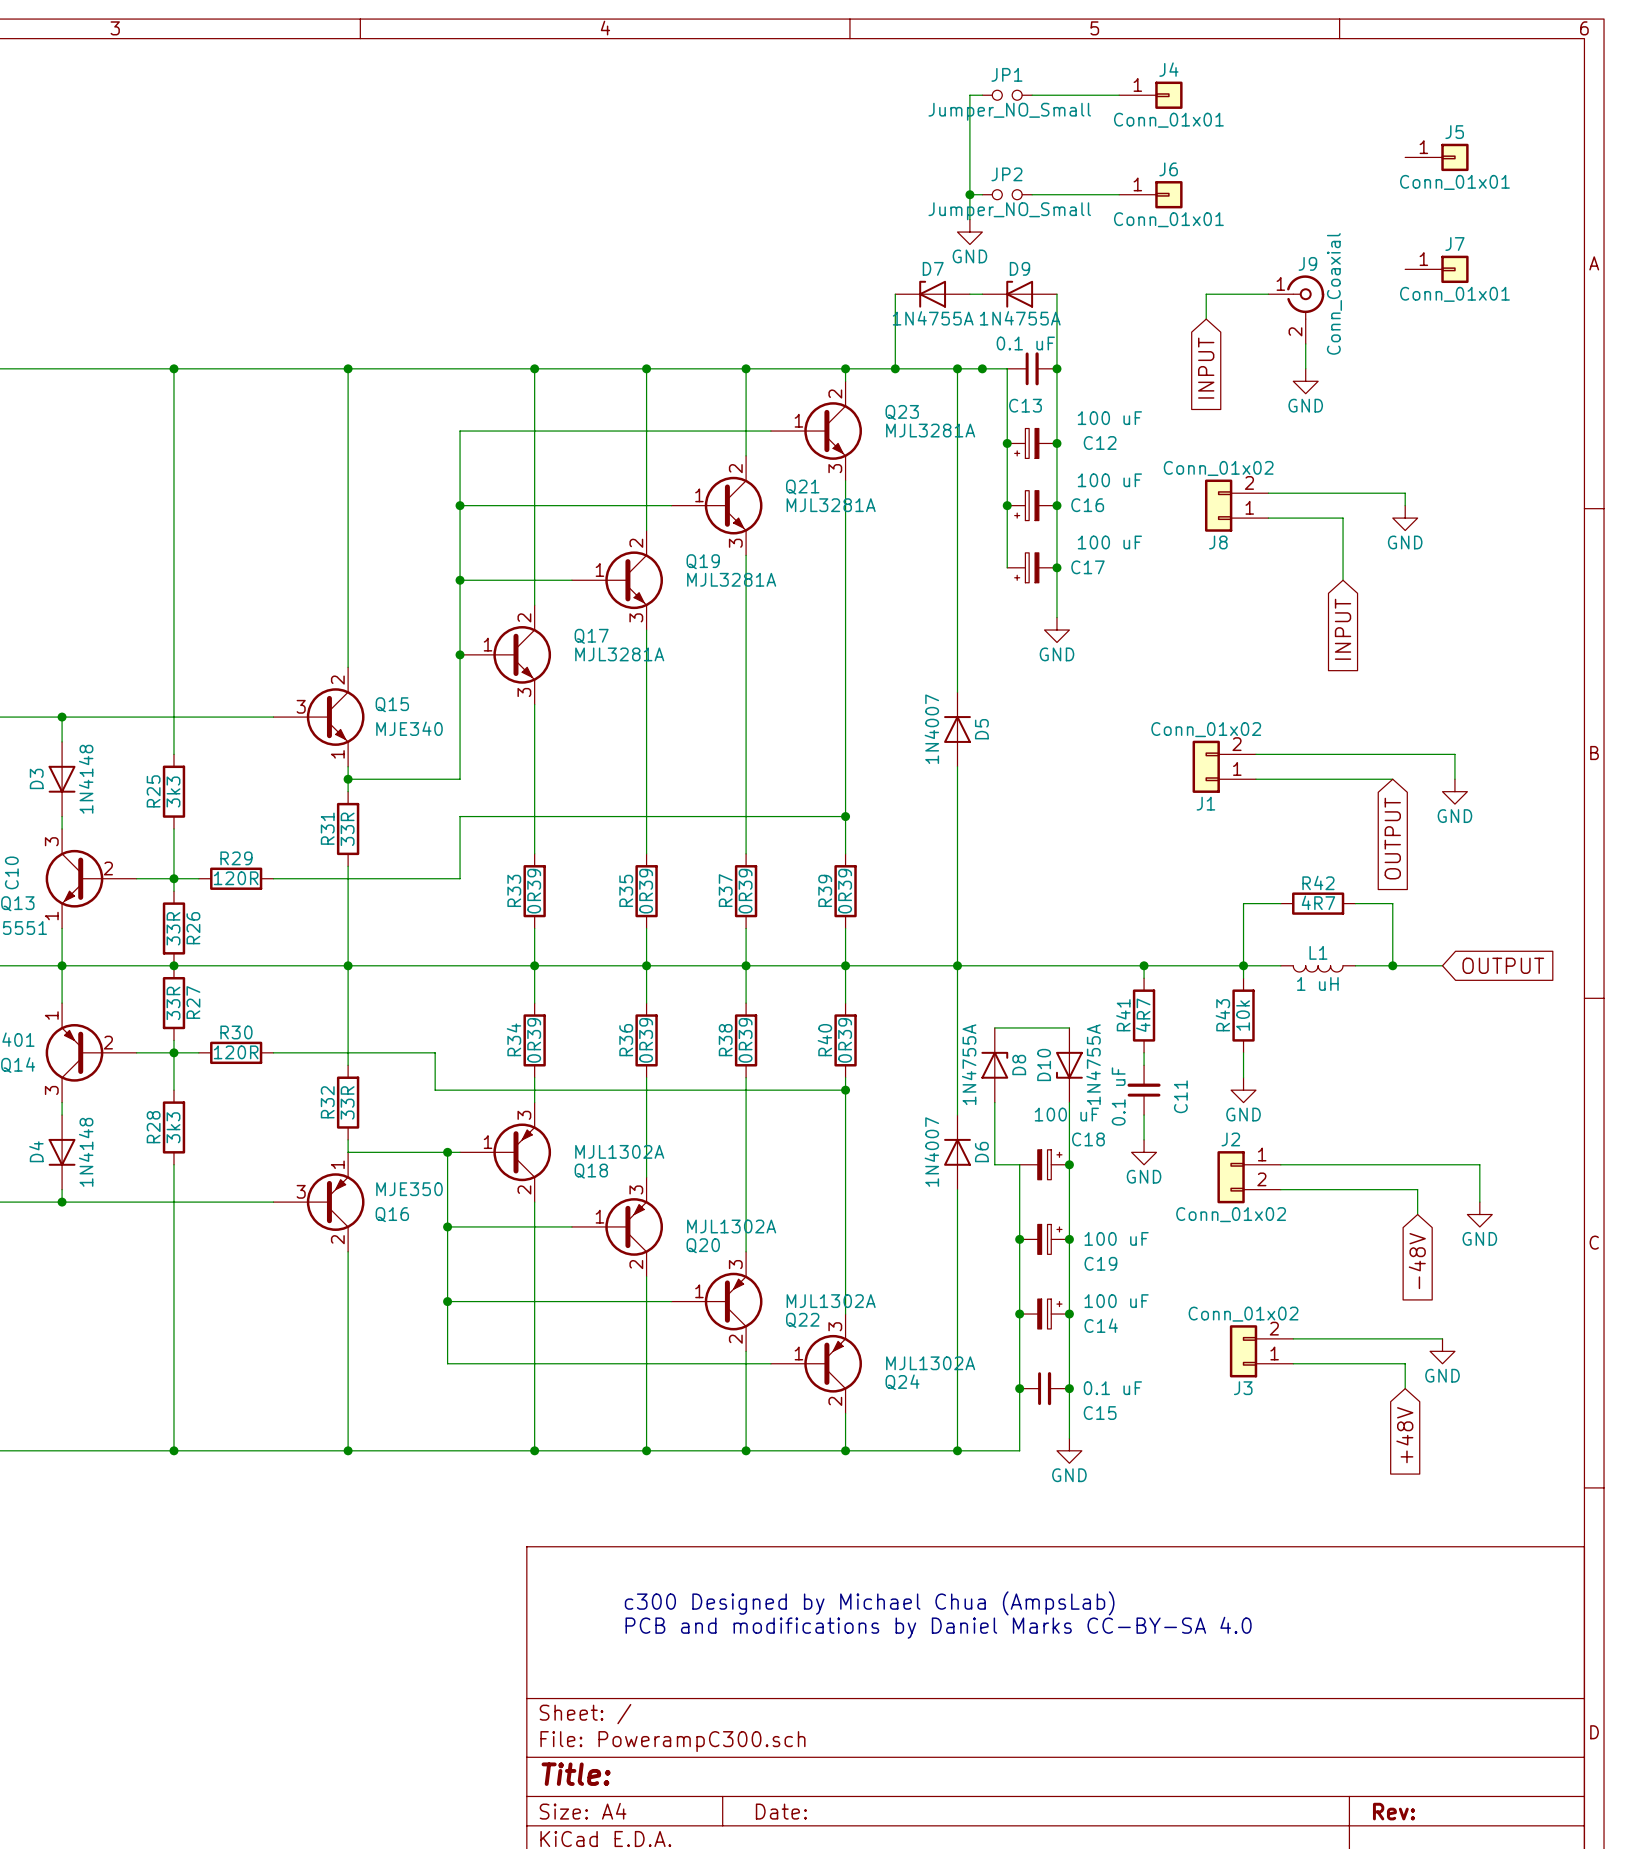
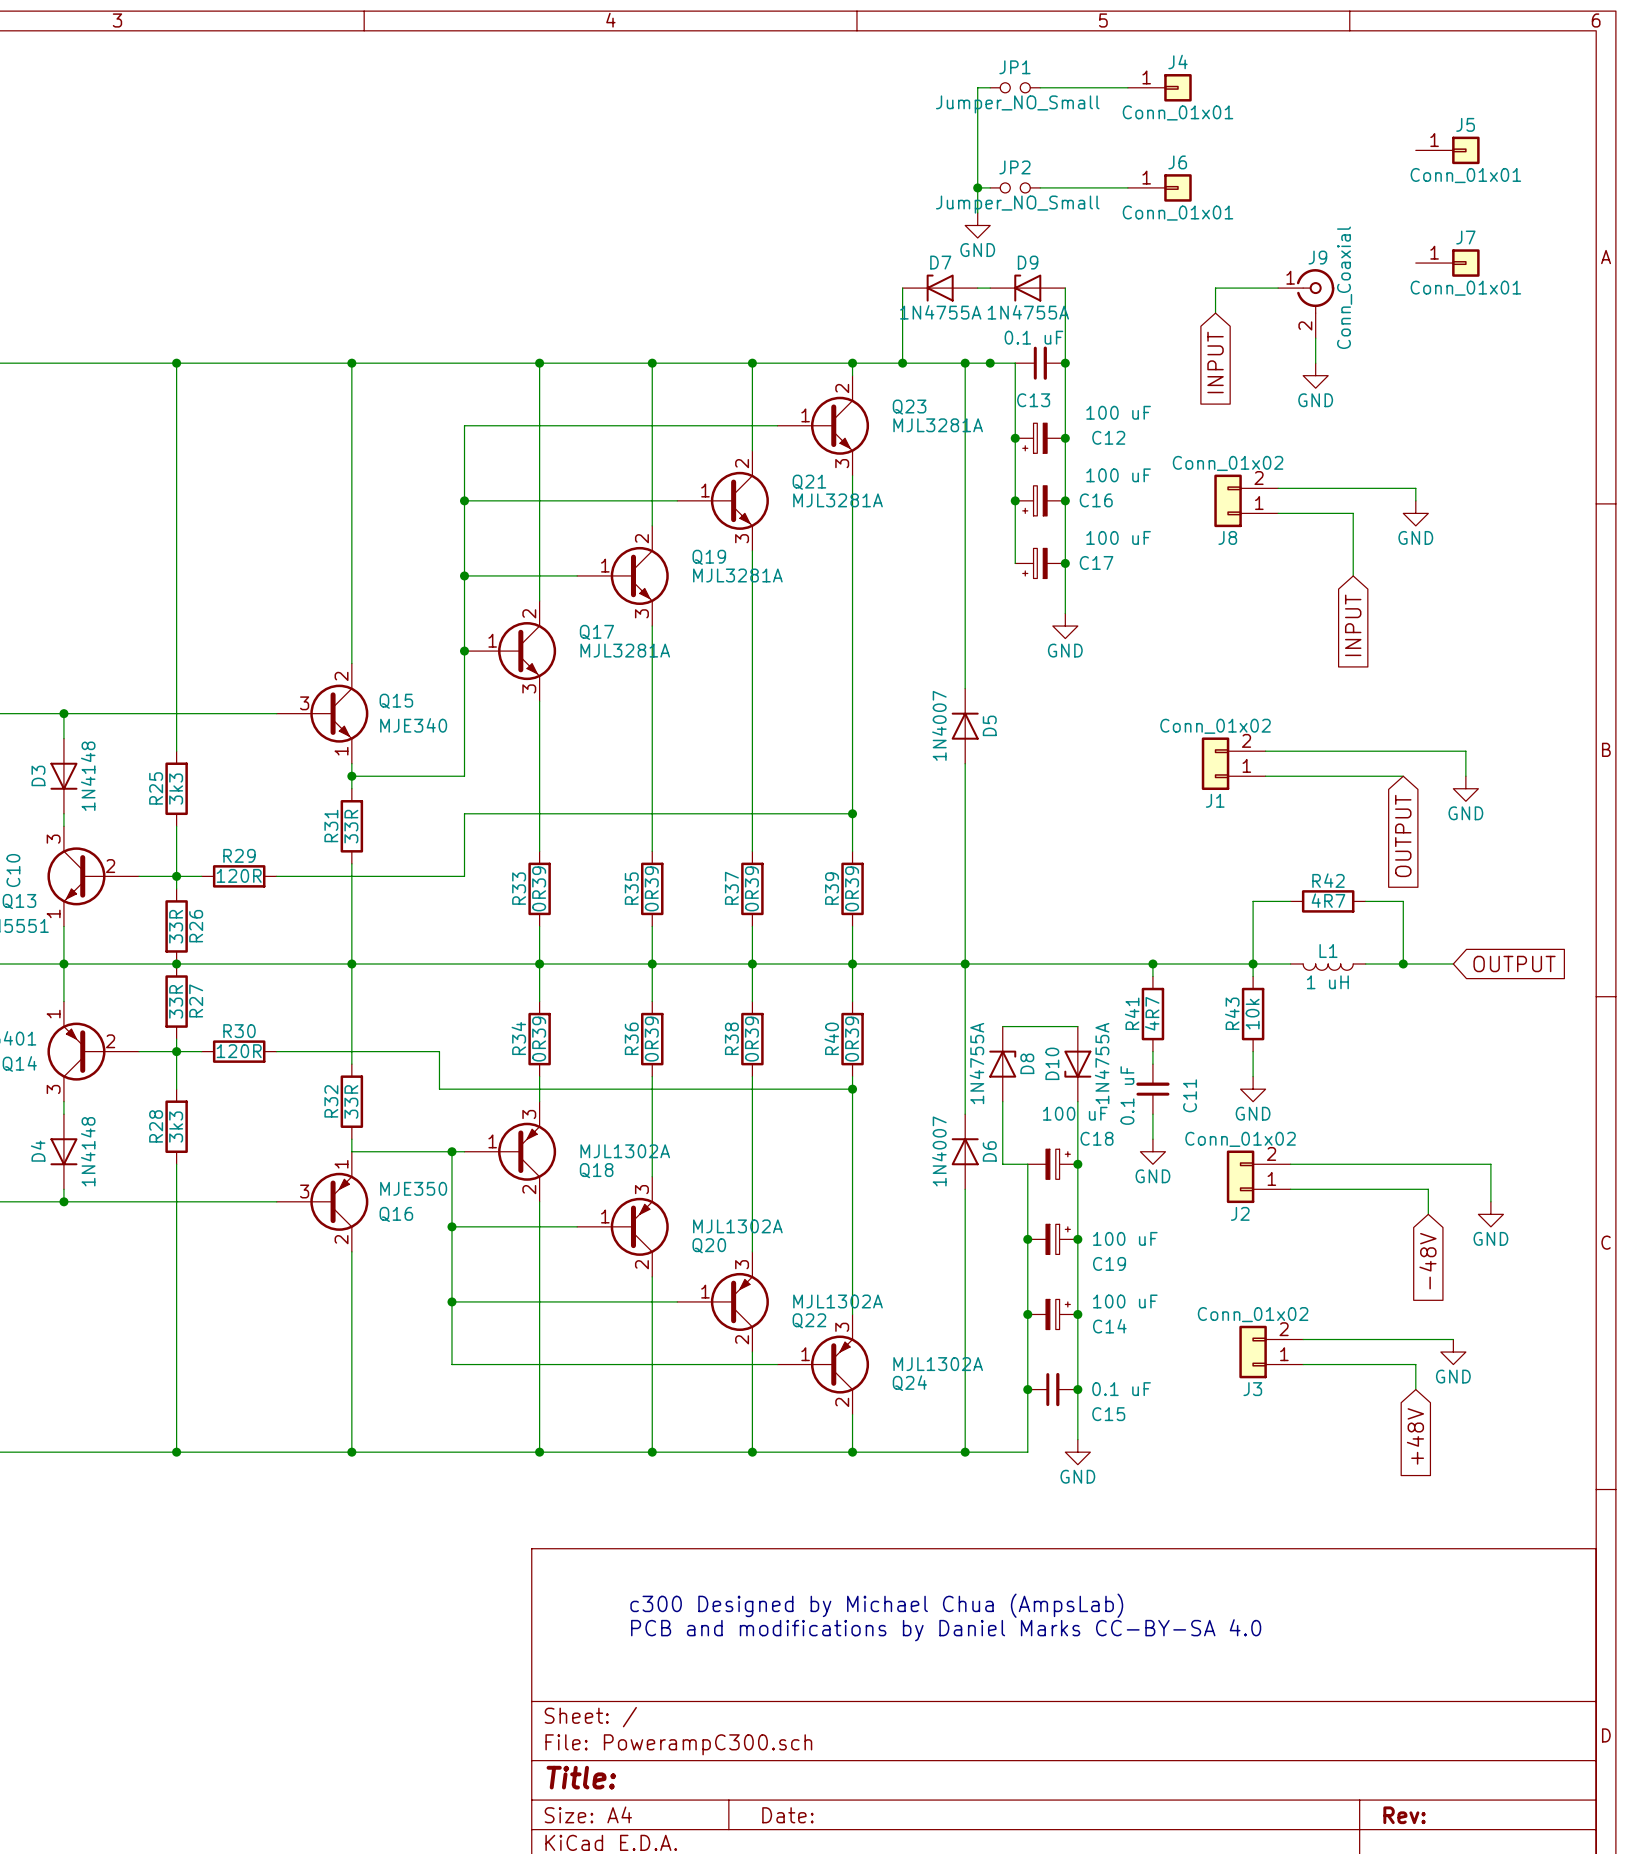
J2 flip: as is (1231, 1177) -> up-down (1240, 1176)

